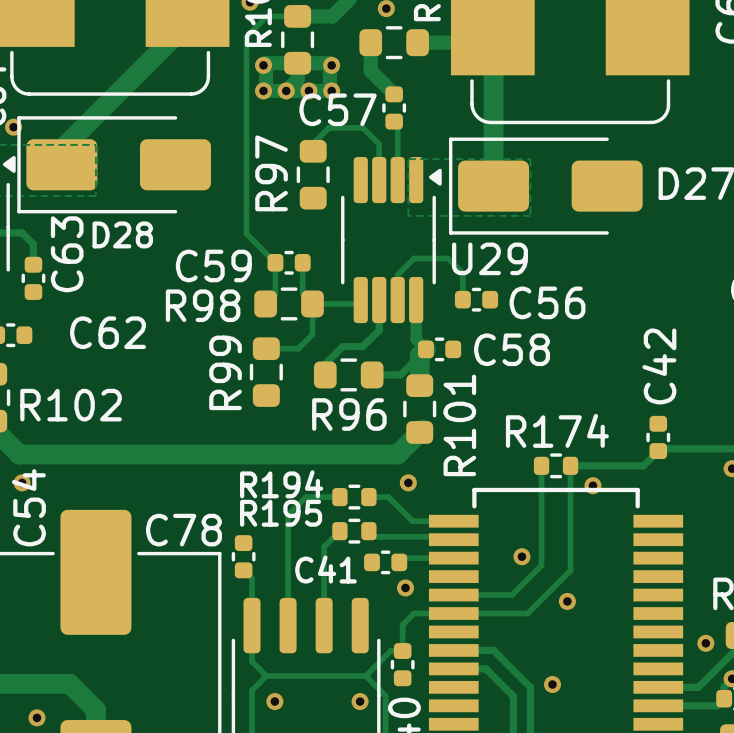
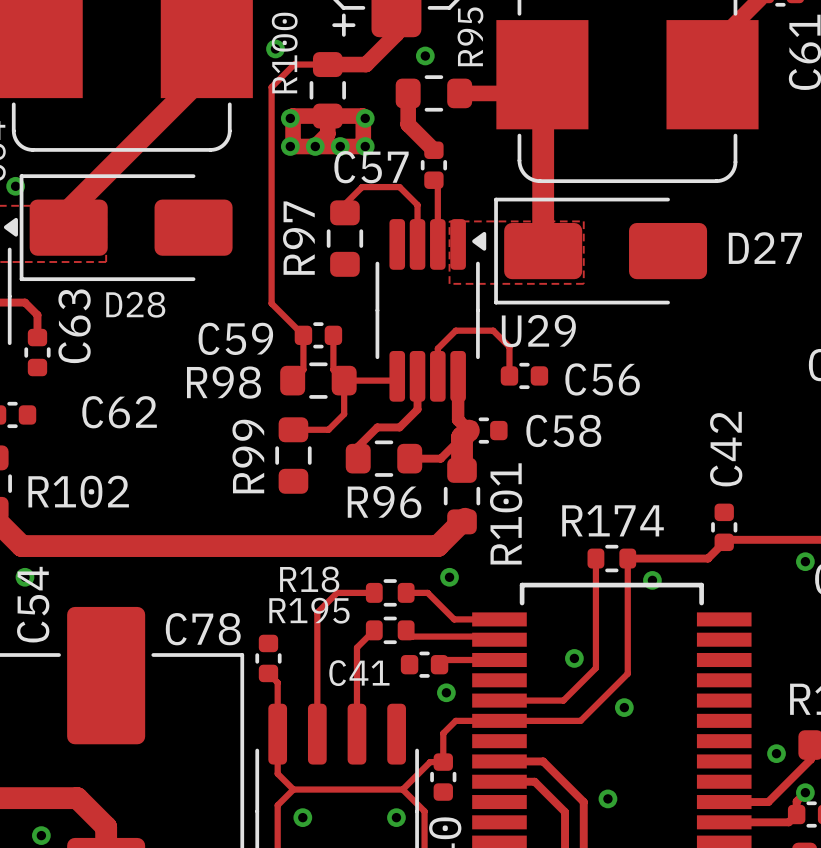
R194 name: R194 (281, 484) -> R18 (309, 579)

